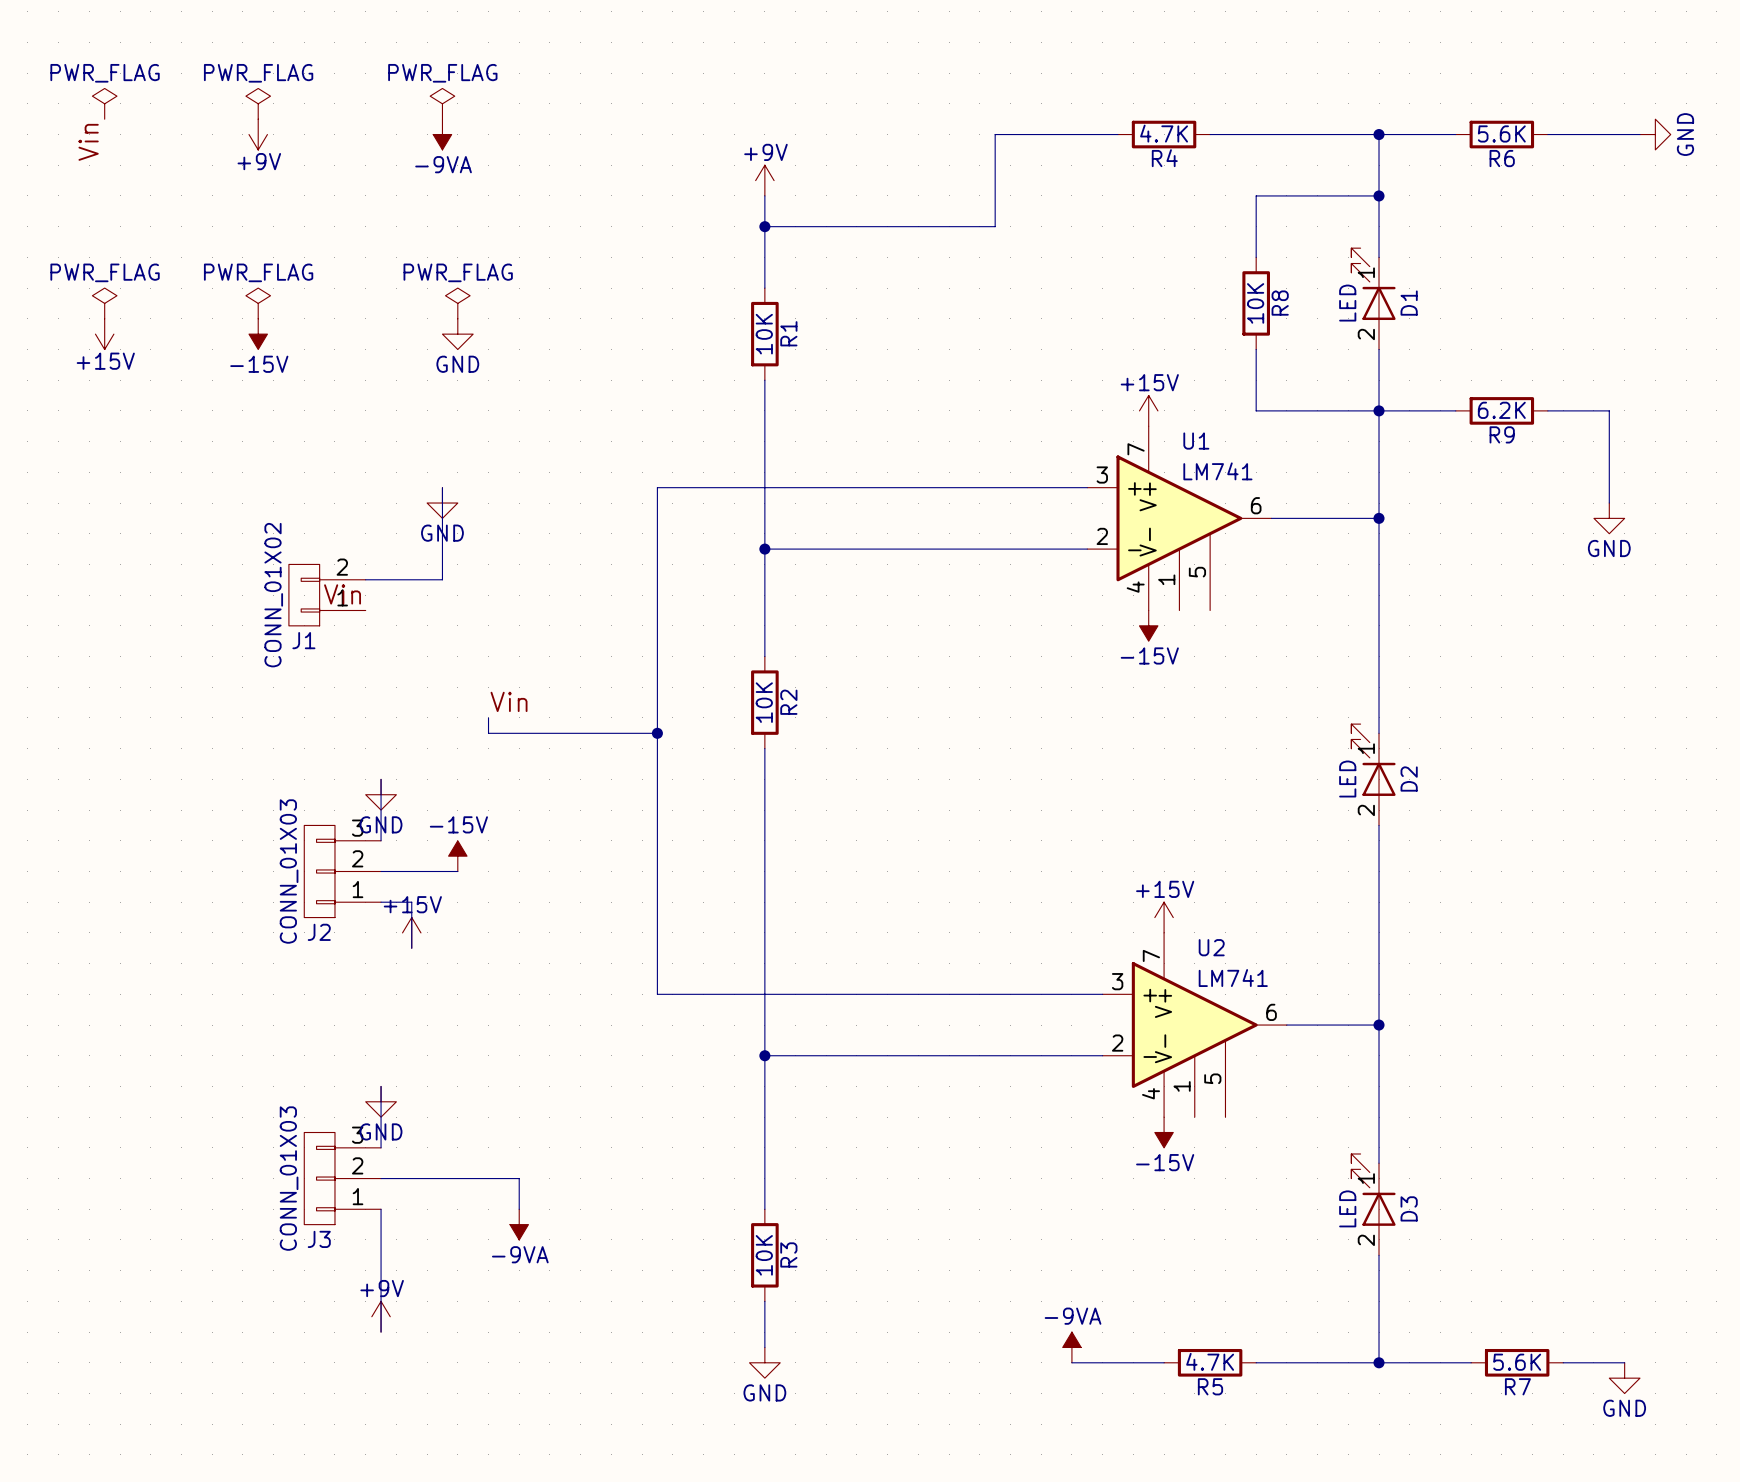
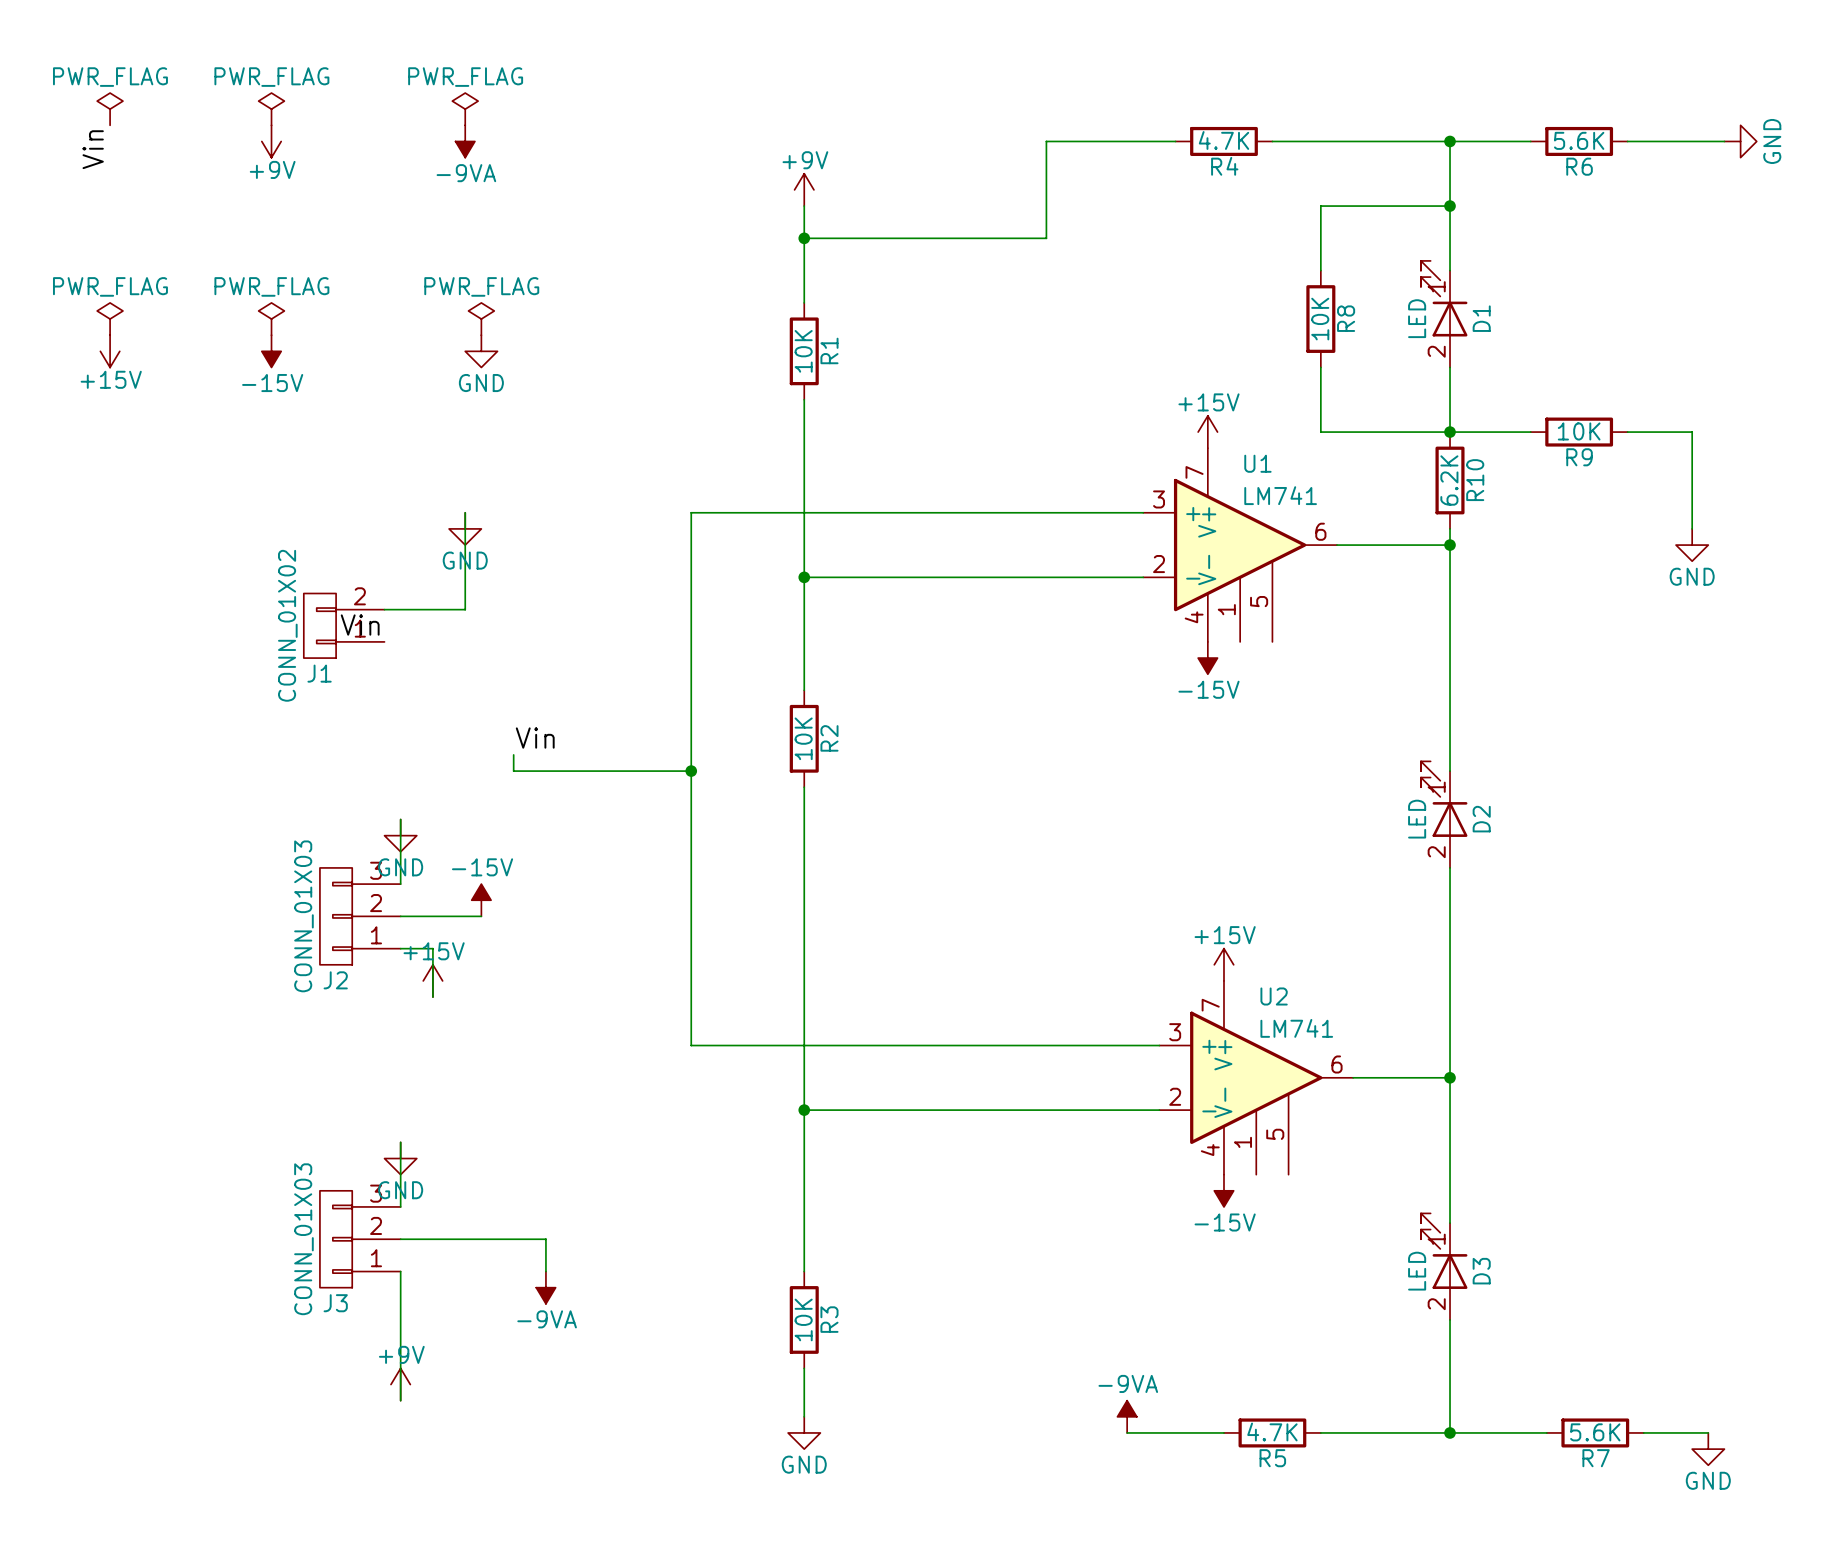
wire: (1379, 410) (1379, 503) -> none
R9 value: 6.2K (1501, 410) -> 10K (1579, 431)
R10: none -> 6.2K (1450, 480)

